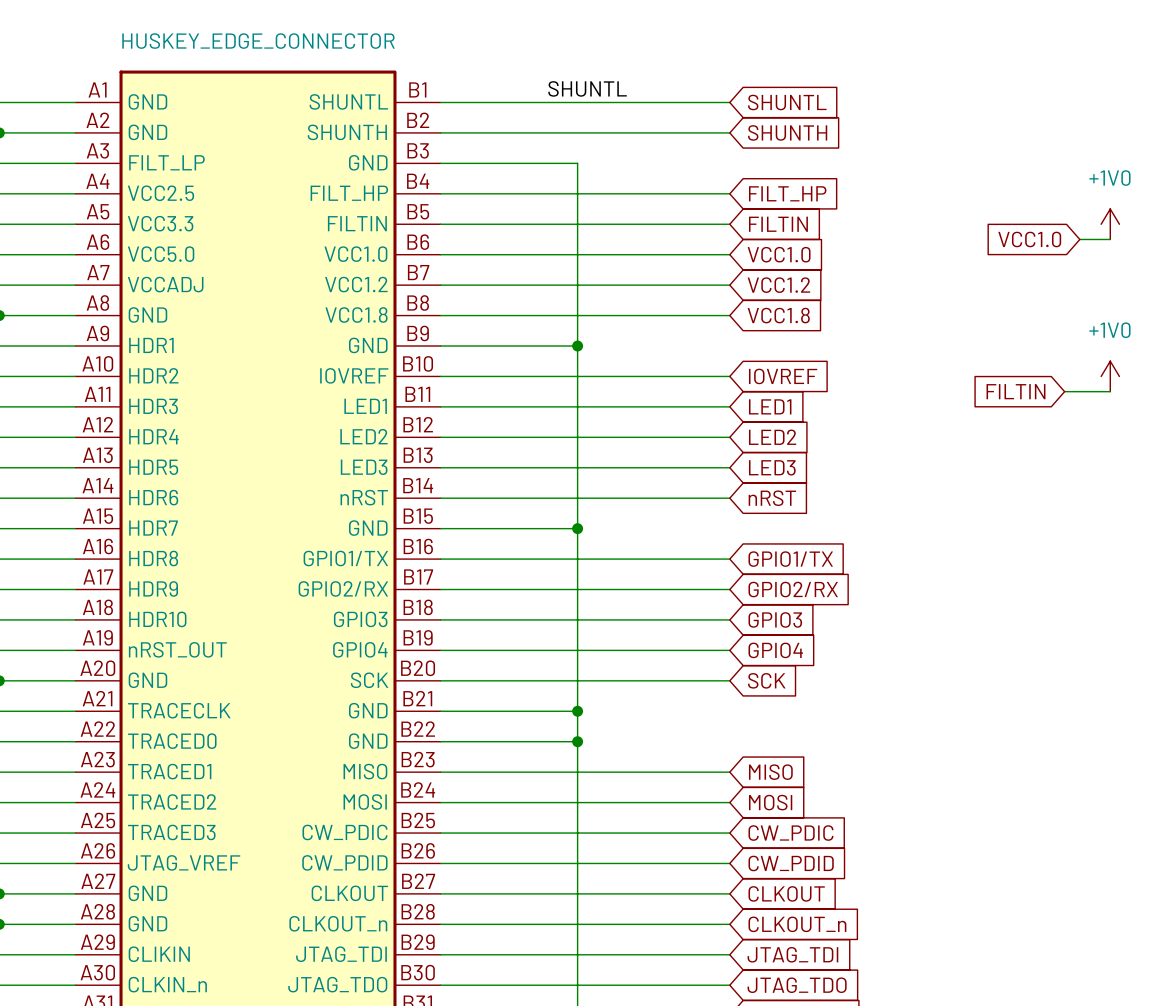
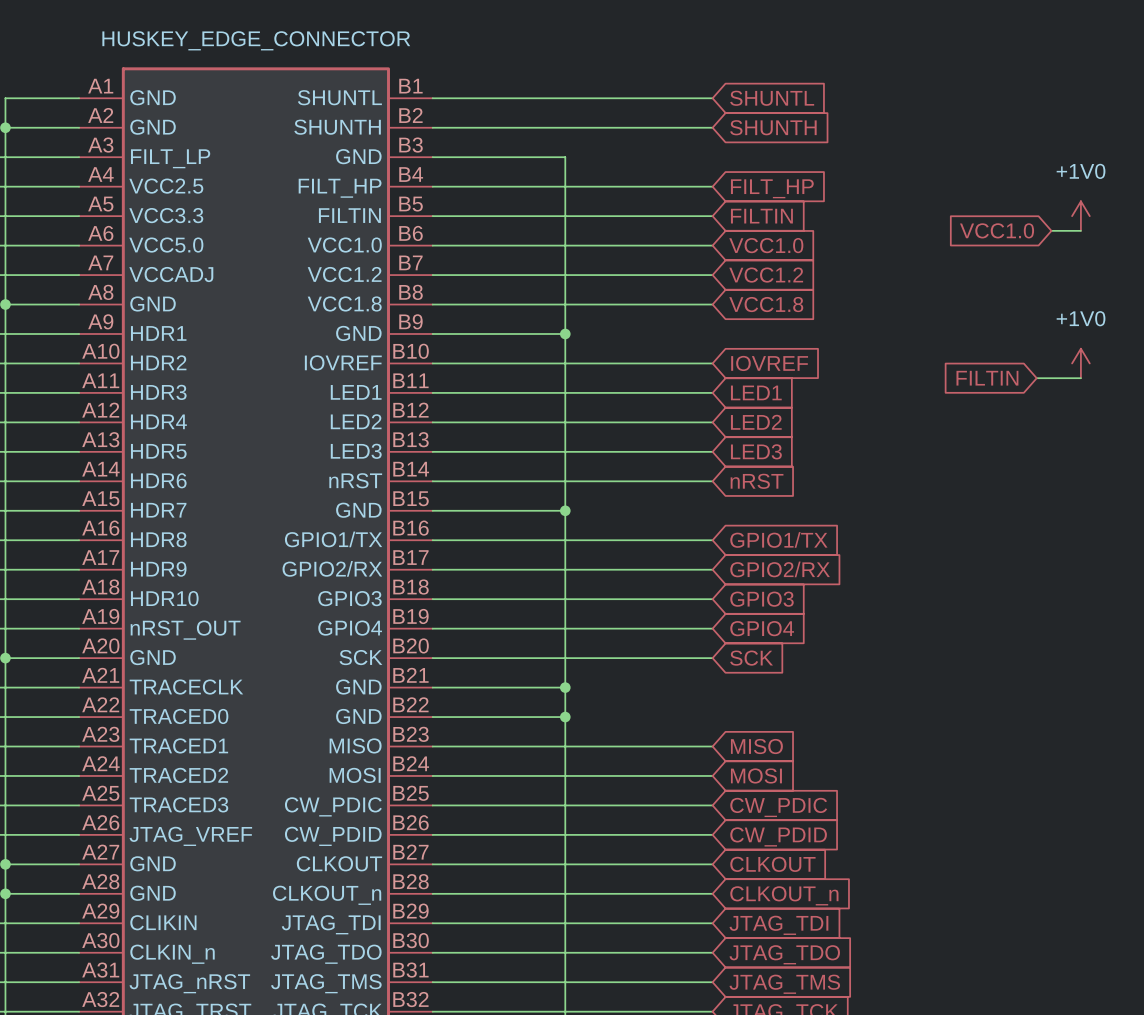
label: SHUNTL (587, 88) -> none

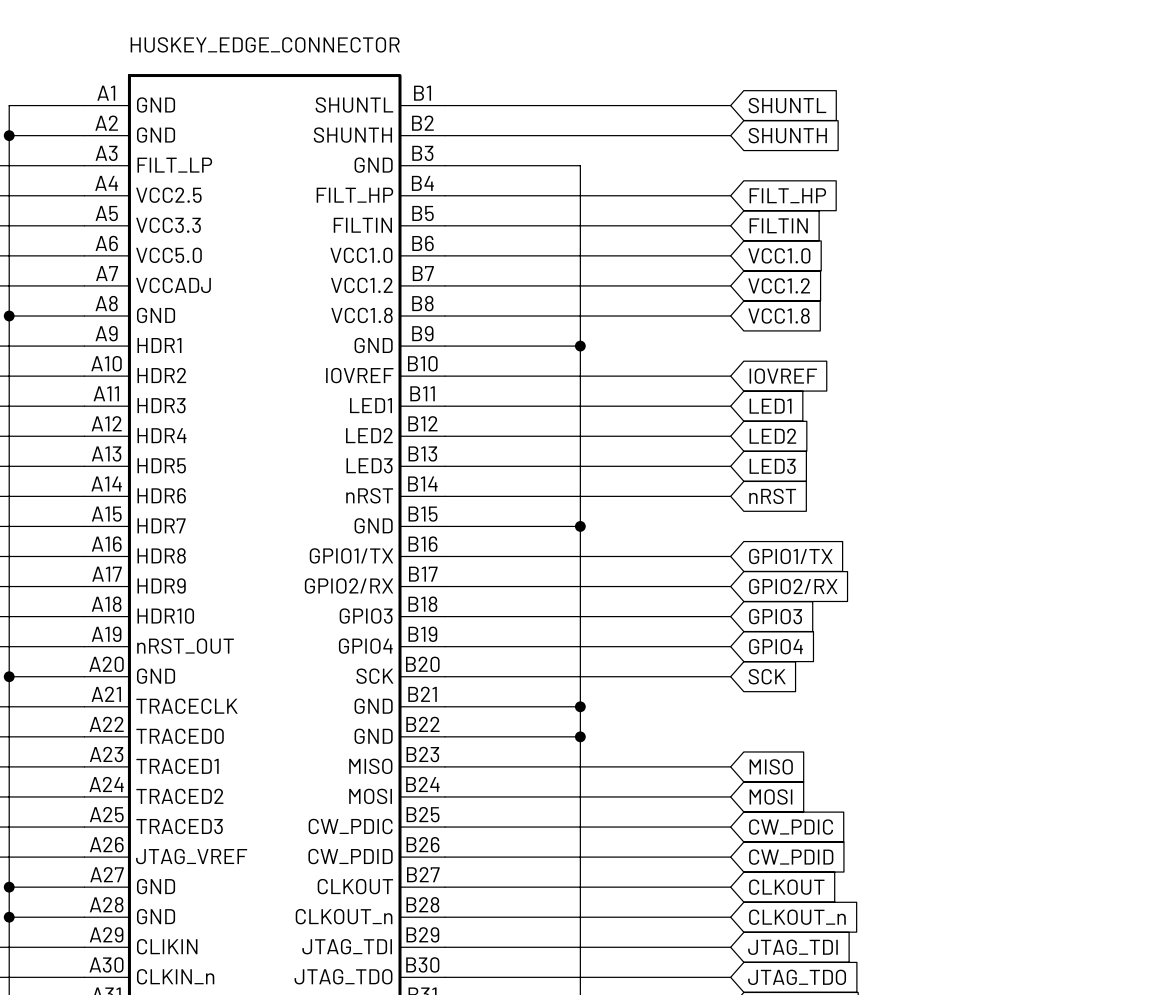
power symbol: +1V0 (1080, 216) -> none
global label: VCC1.0 (997, 230) -> none
wire: (1051, 230) (1080, 230) -> none
power symbol: +1V0 (1080, 363) -> none
global label: FILTIN (987, 378) -> none
wire: (1036, 378) (1080, 378) -> none

